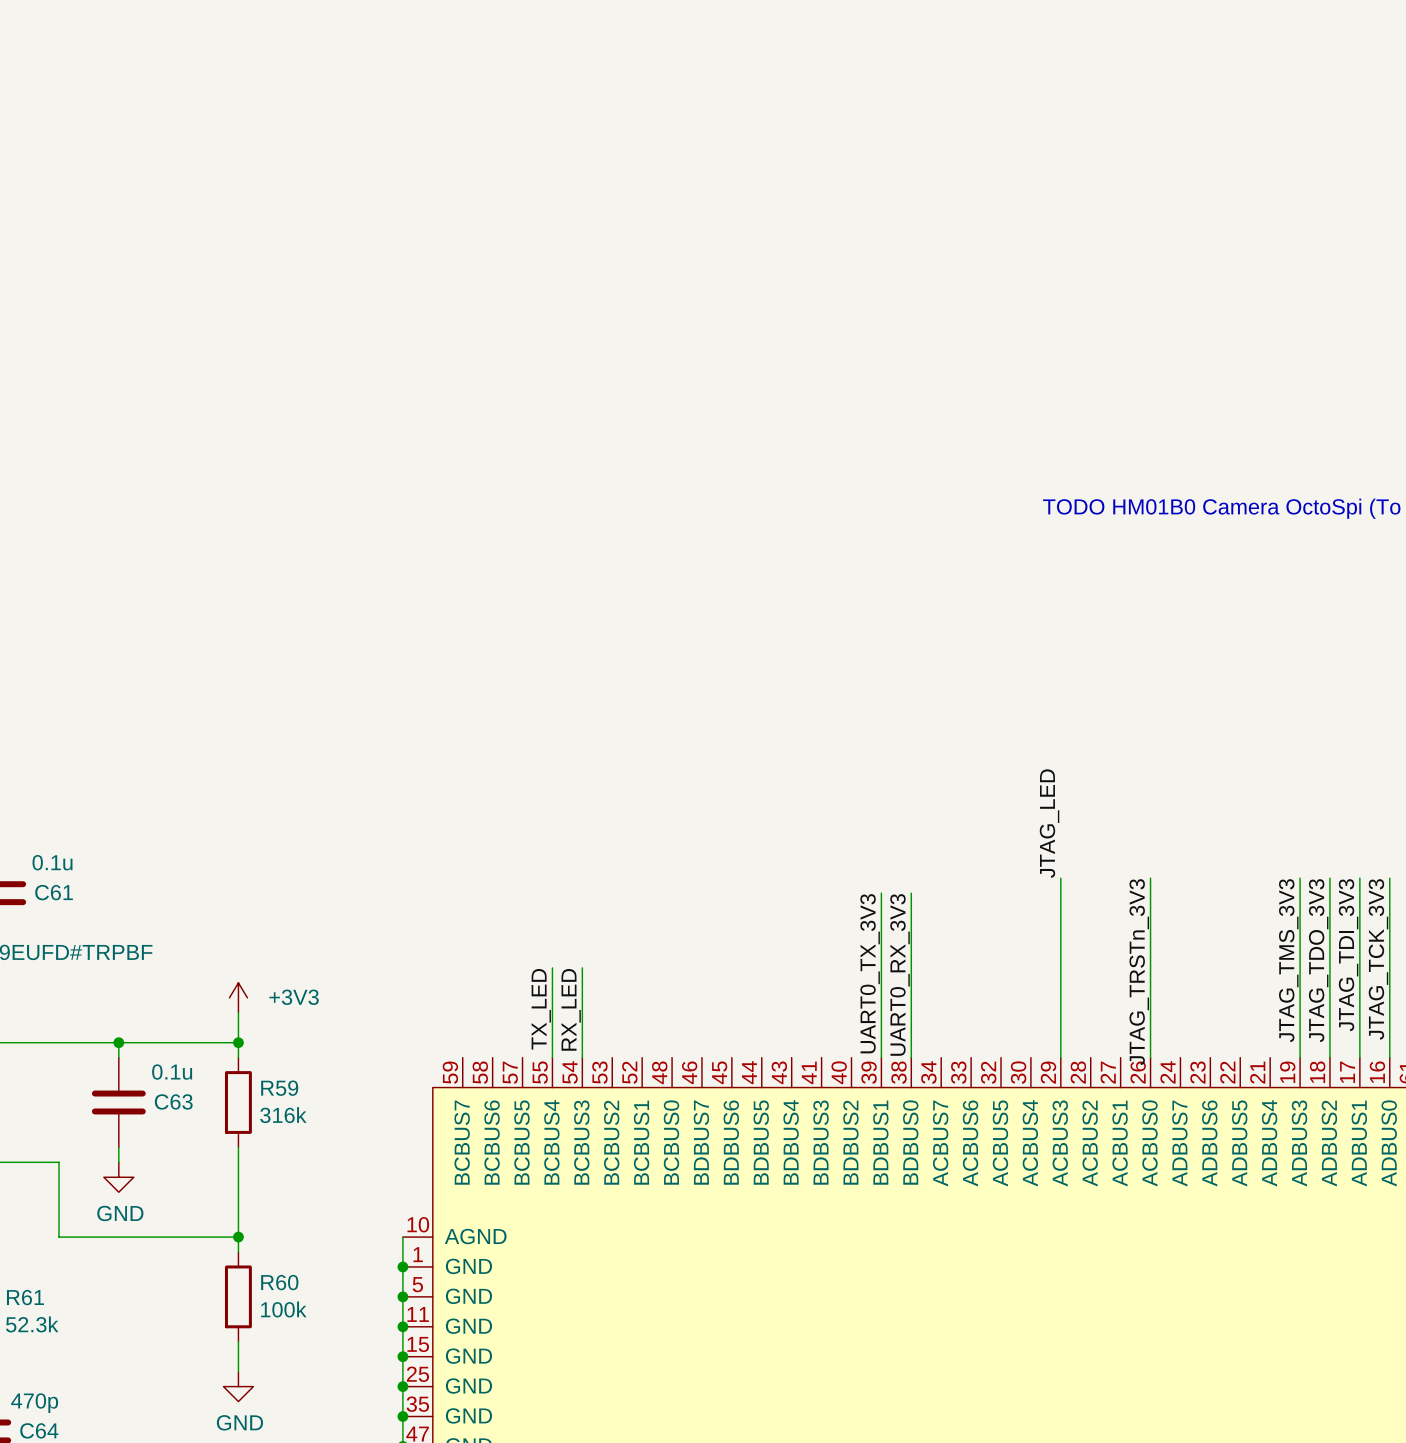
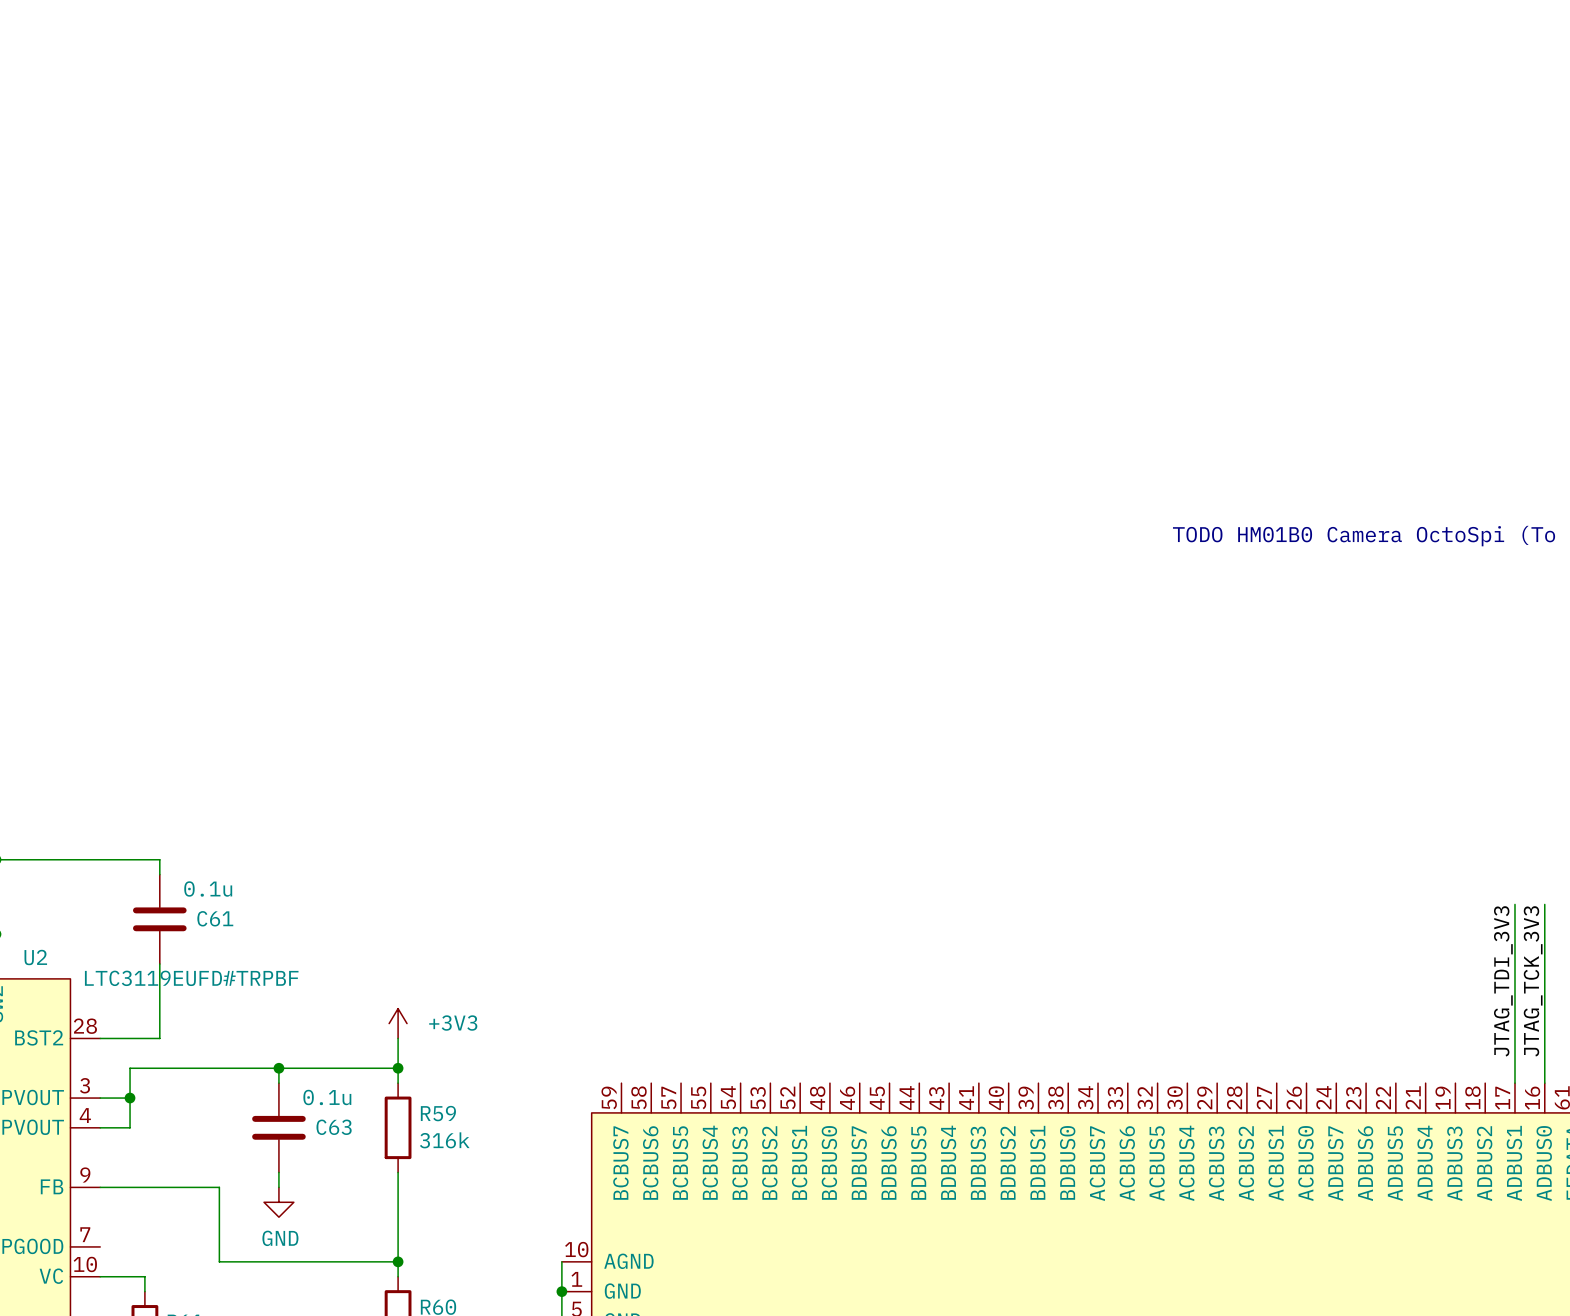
label: JTAG_LED (1049, 823) -> none
wire: (1060, 878) (1060, 1057) -> none
wire: (1150, 878) (1150, 1057) -> none
wire: (1300, 878) (1300, 1057) -> none
wire: (1329, 878) (1329, 1057) -> none
wire: (881, 893) (881, 1057) -> none
wire: (911, 893) (911, 1057) -> none
label: JTAG_TMS_3V3 (1288, 960) -> none
label: JTAG_TDO_3V3 (1318, 960) -> none
wire: (552, 967) (552, 1057) -> none
wire: (582, 967) (582, 1057) -> none
label: JTAG_TRSTn_3V3 (1139, 972) -> none
label: UART0_TX_3V3 (870, 973) -> none
label: UART0_RX_3V3 (900, 974) -> none
label: TX_LED (541, 1009) -> none
label: RX_LED (571, 1009) -> none

